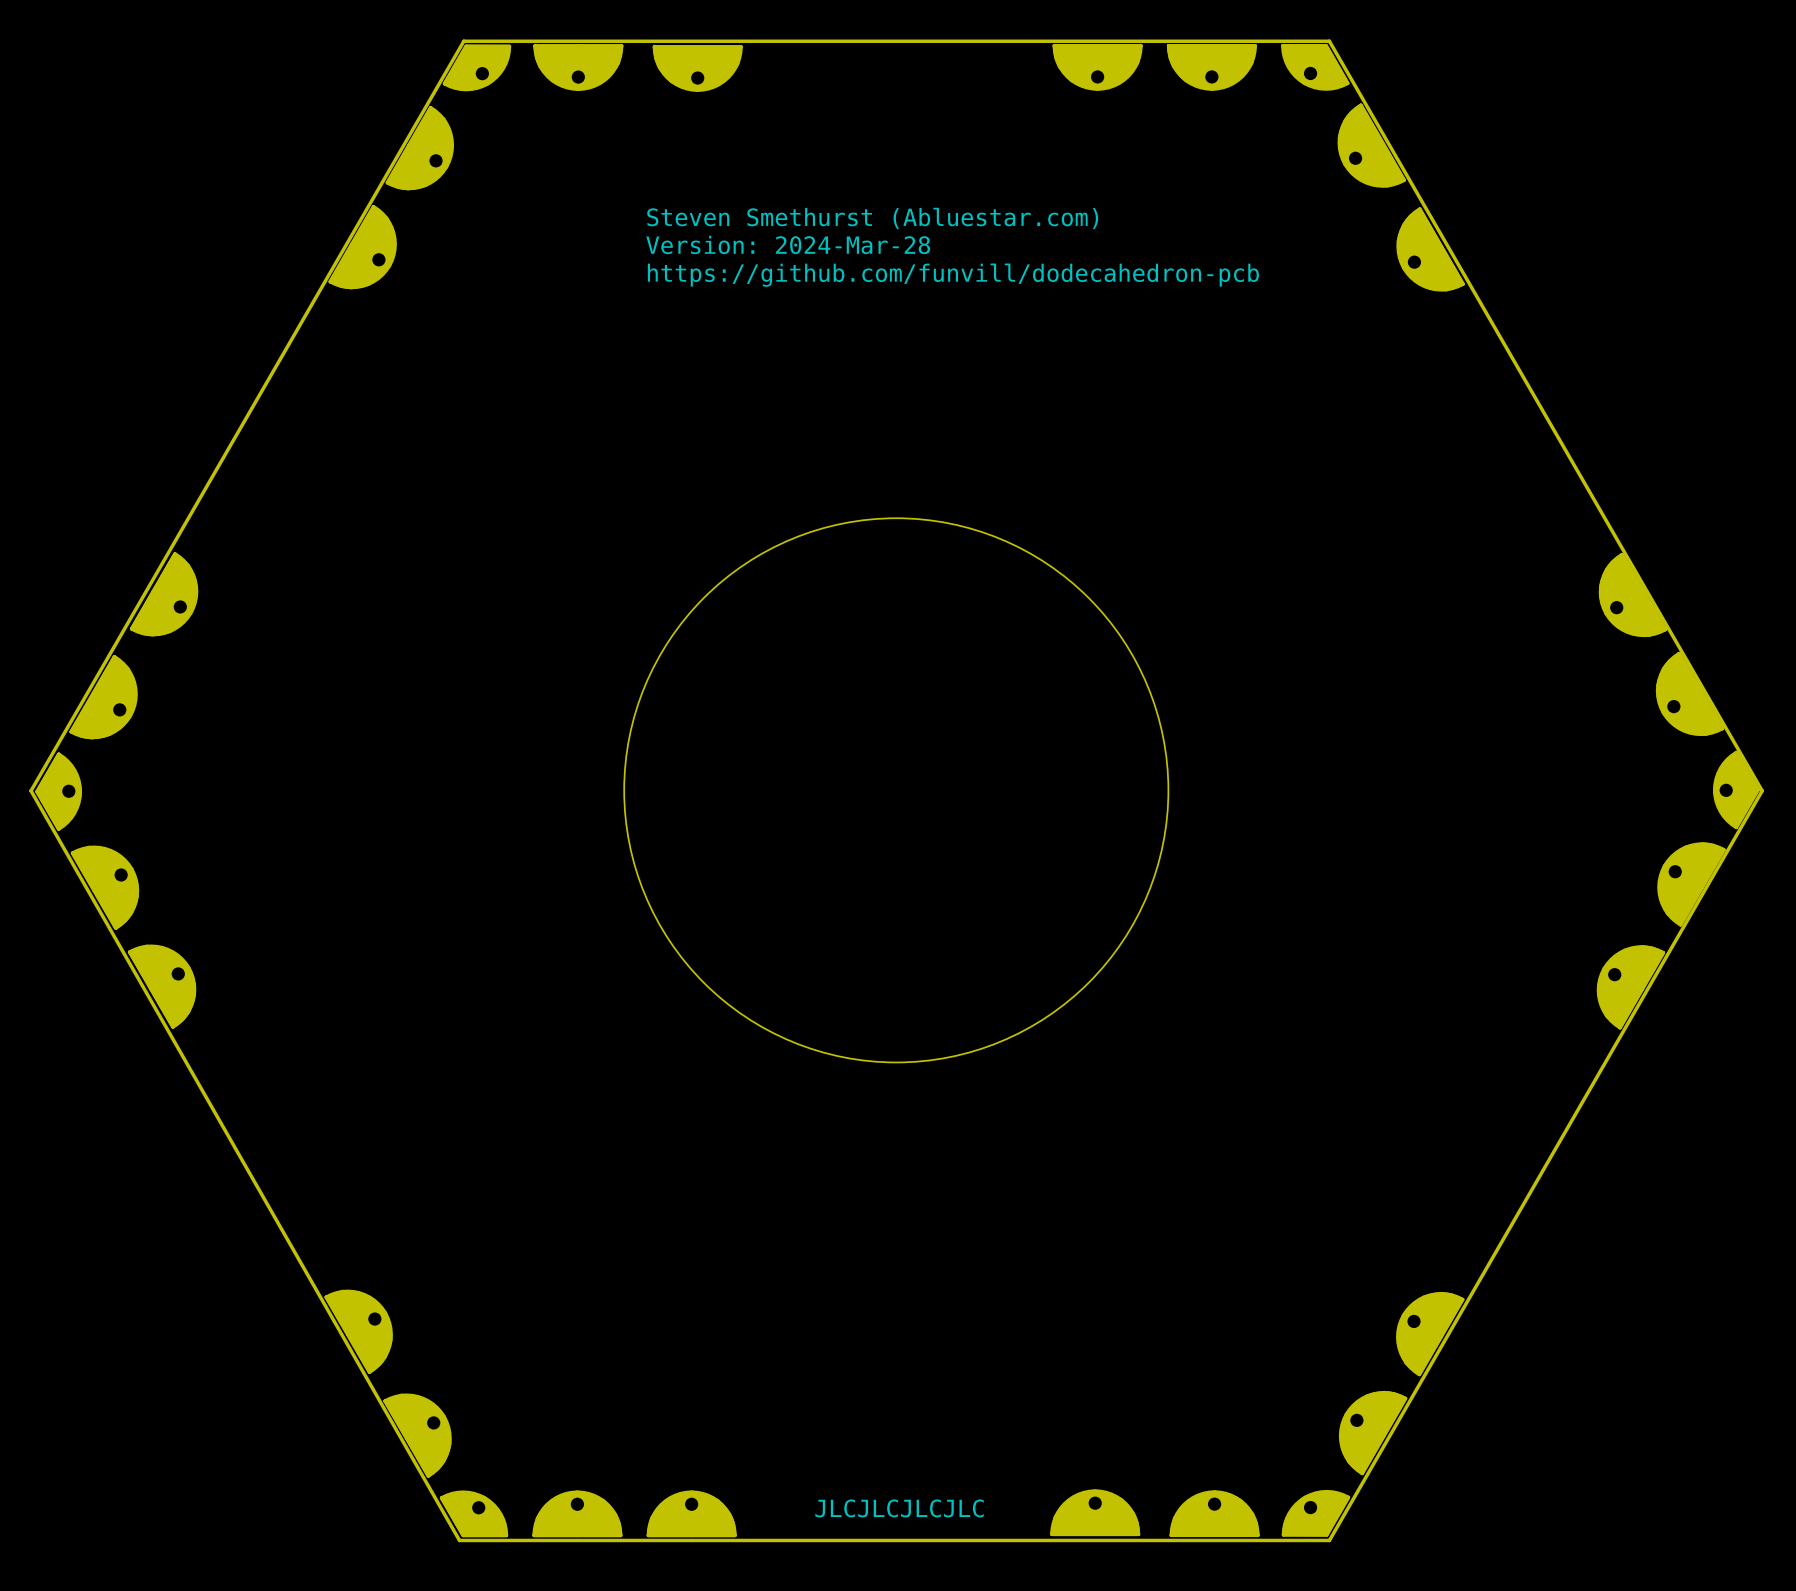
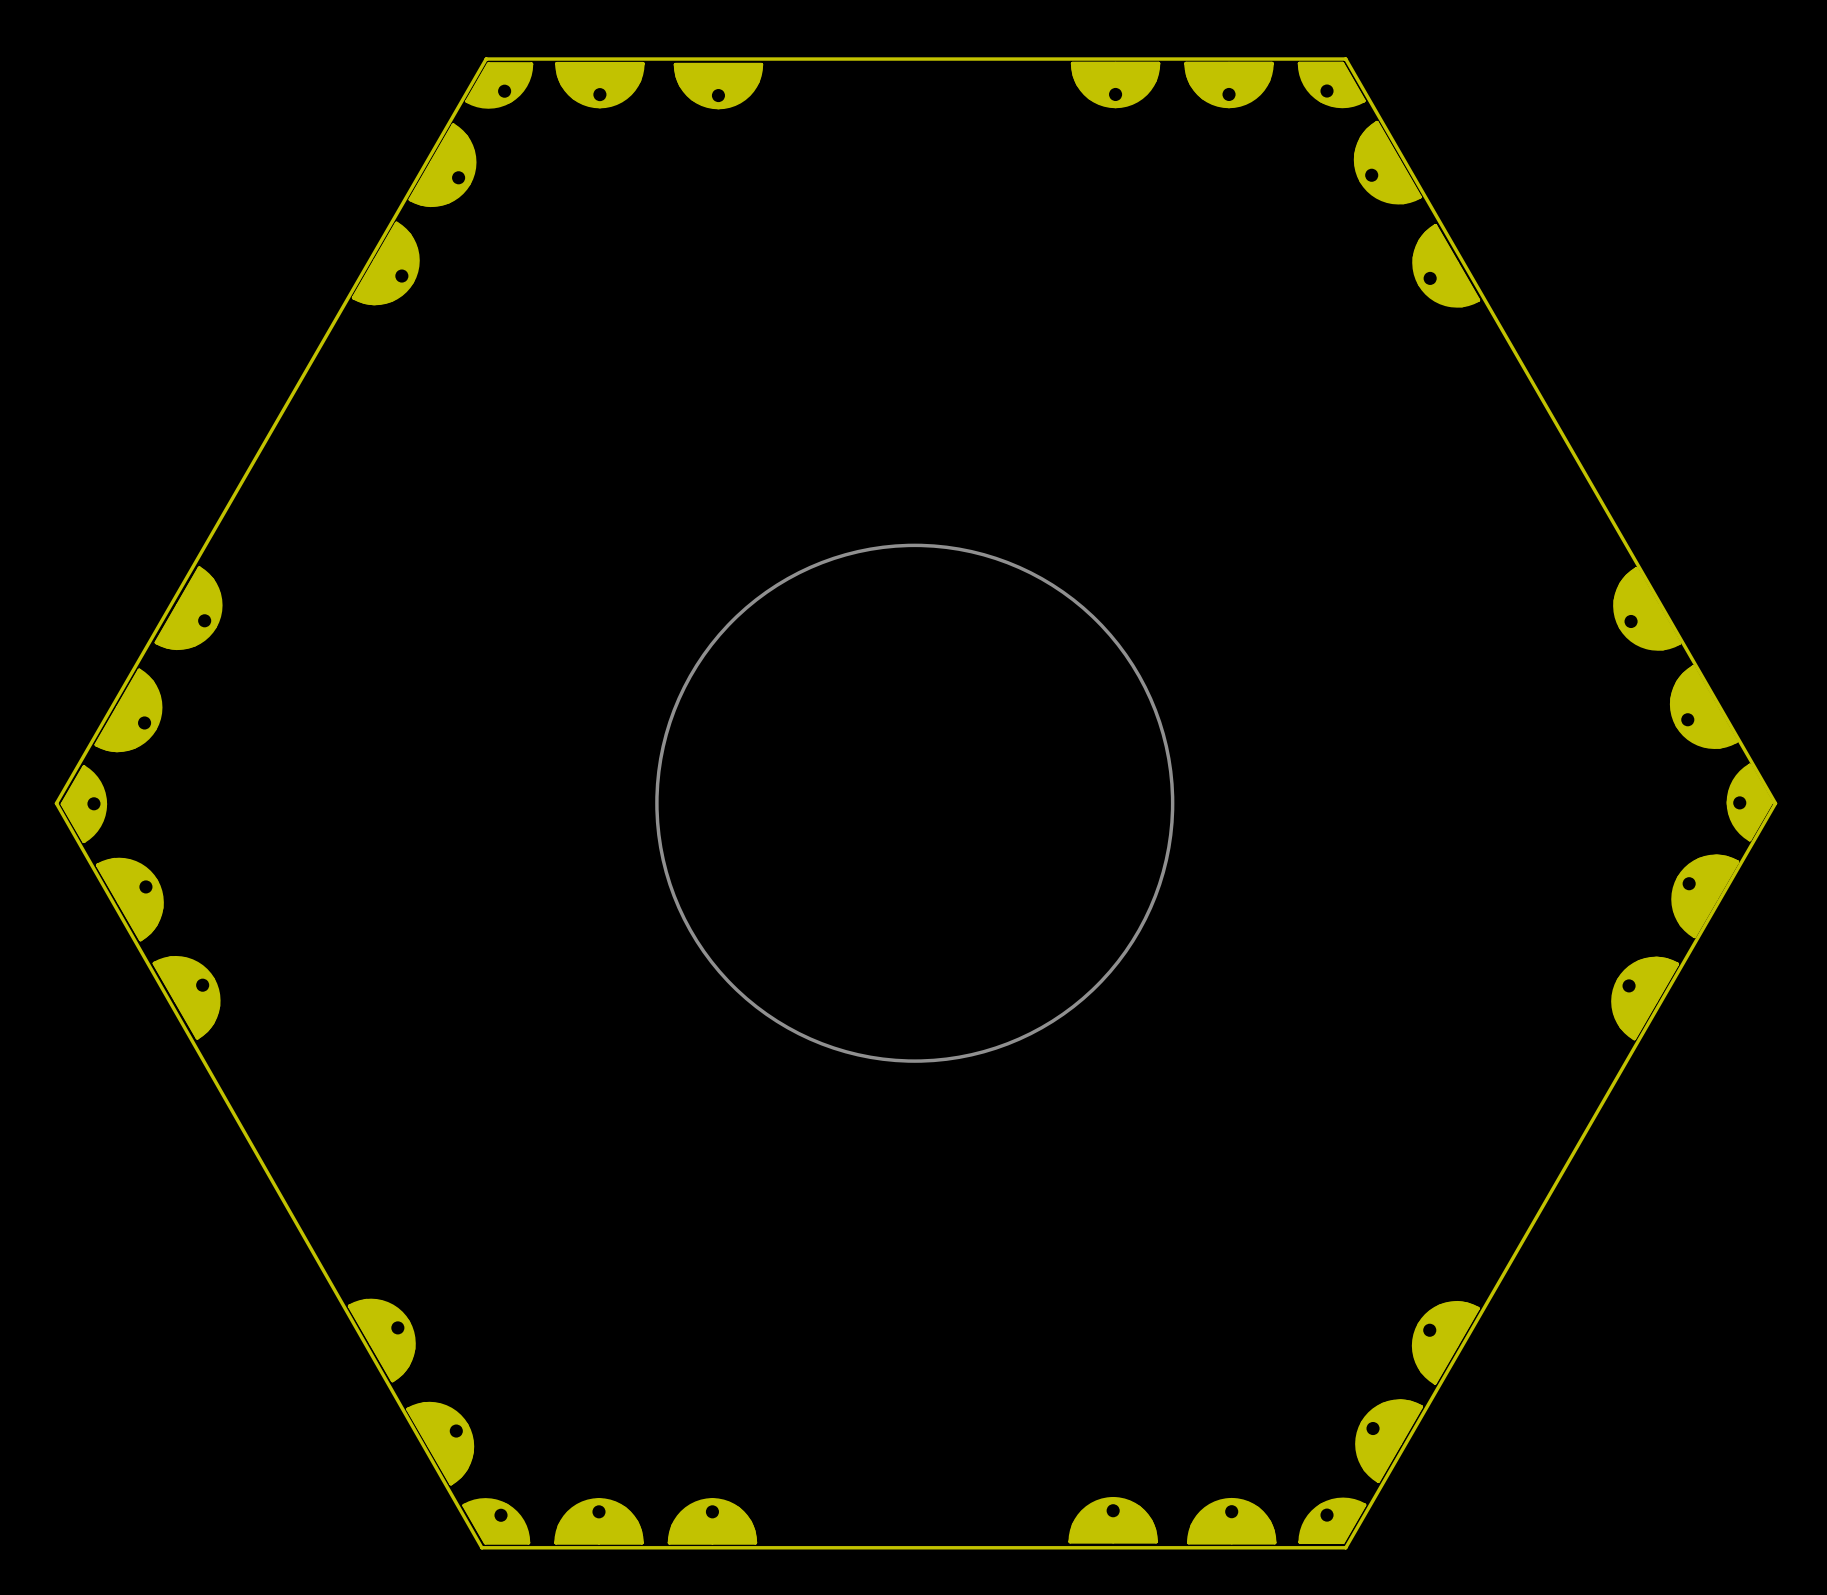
text: Steven Smethurst (Abluestar.com) (872, 218) -> none
text: Version: 2024-Mar-28 (788, 244) -> none
text: https://github.com/funvill/dodecahedron-pcb (953, 275) -> none
round board edge: [623, 517, 1170, 1064] -> none
drawing: none -> [655, 543, 1175, 1063]
text: JLCJLCJLCJLC (899, 1508) -> none

